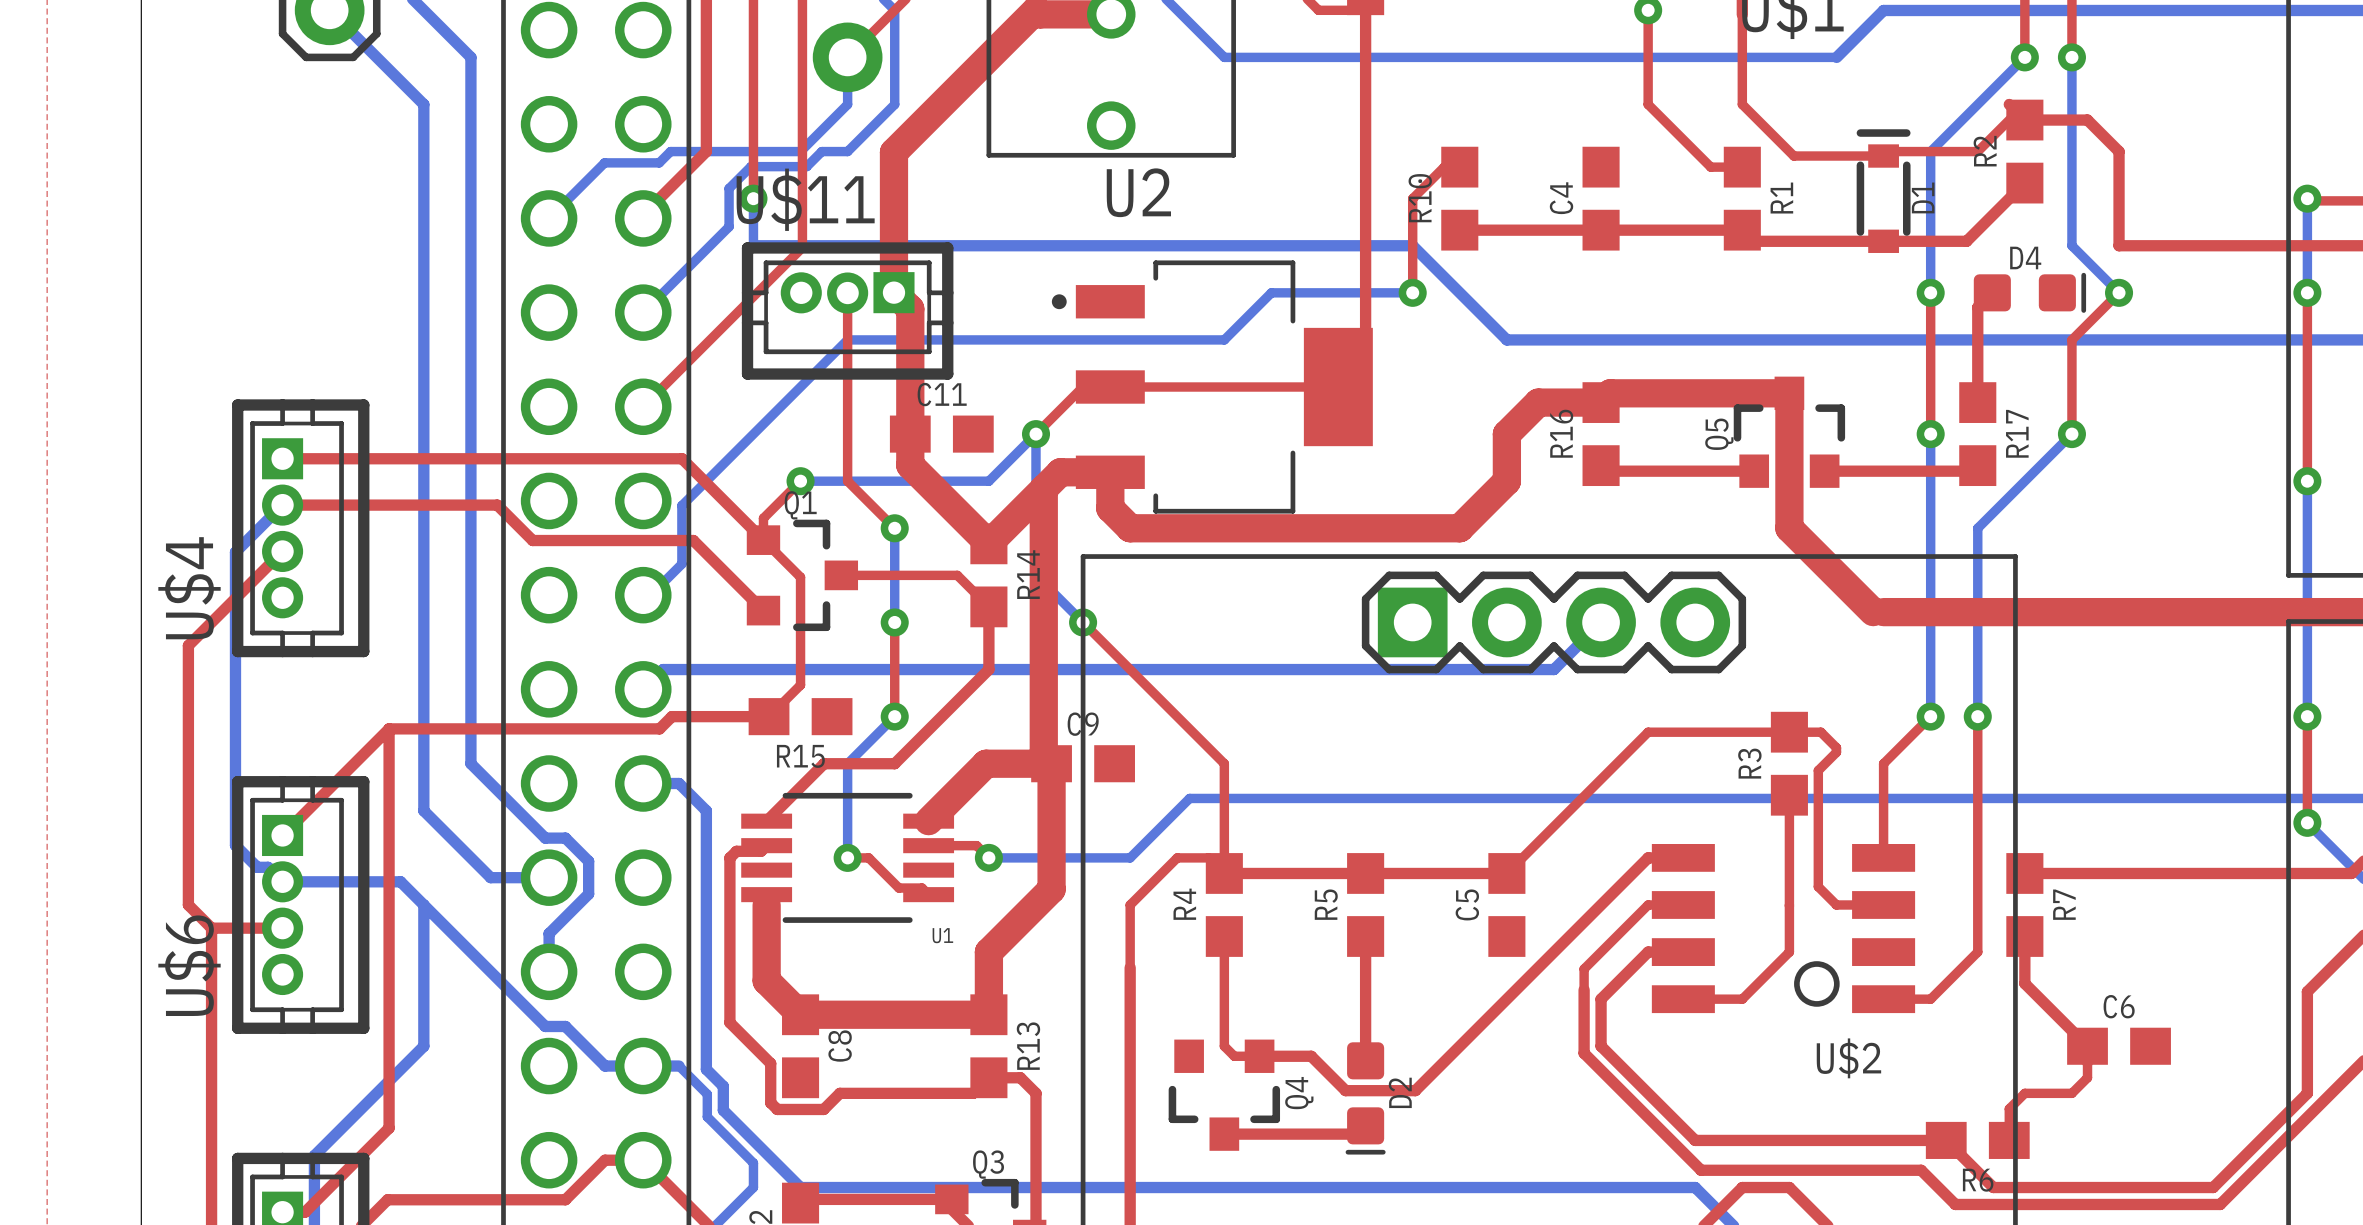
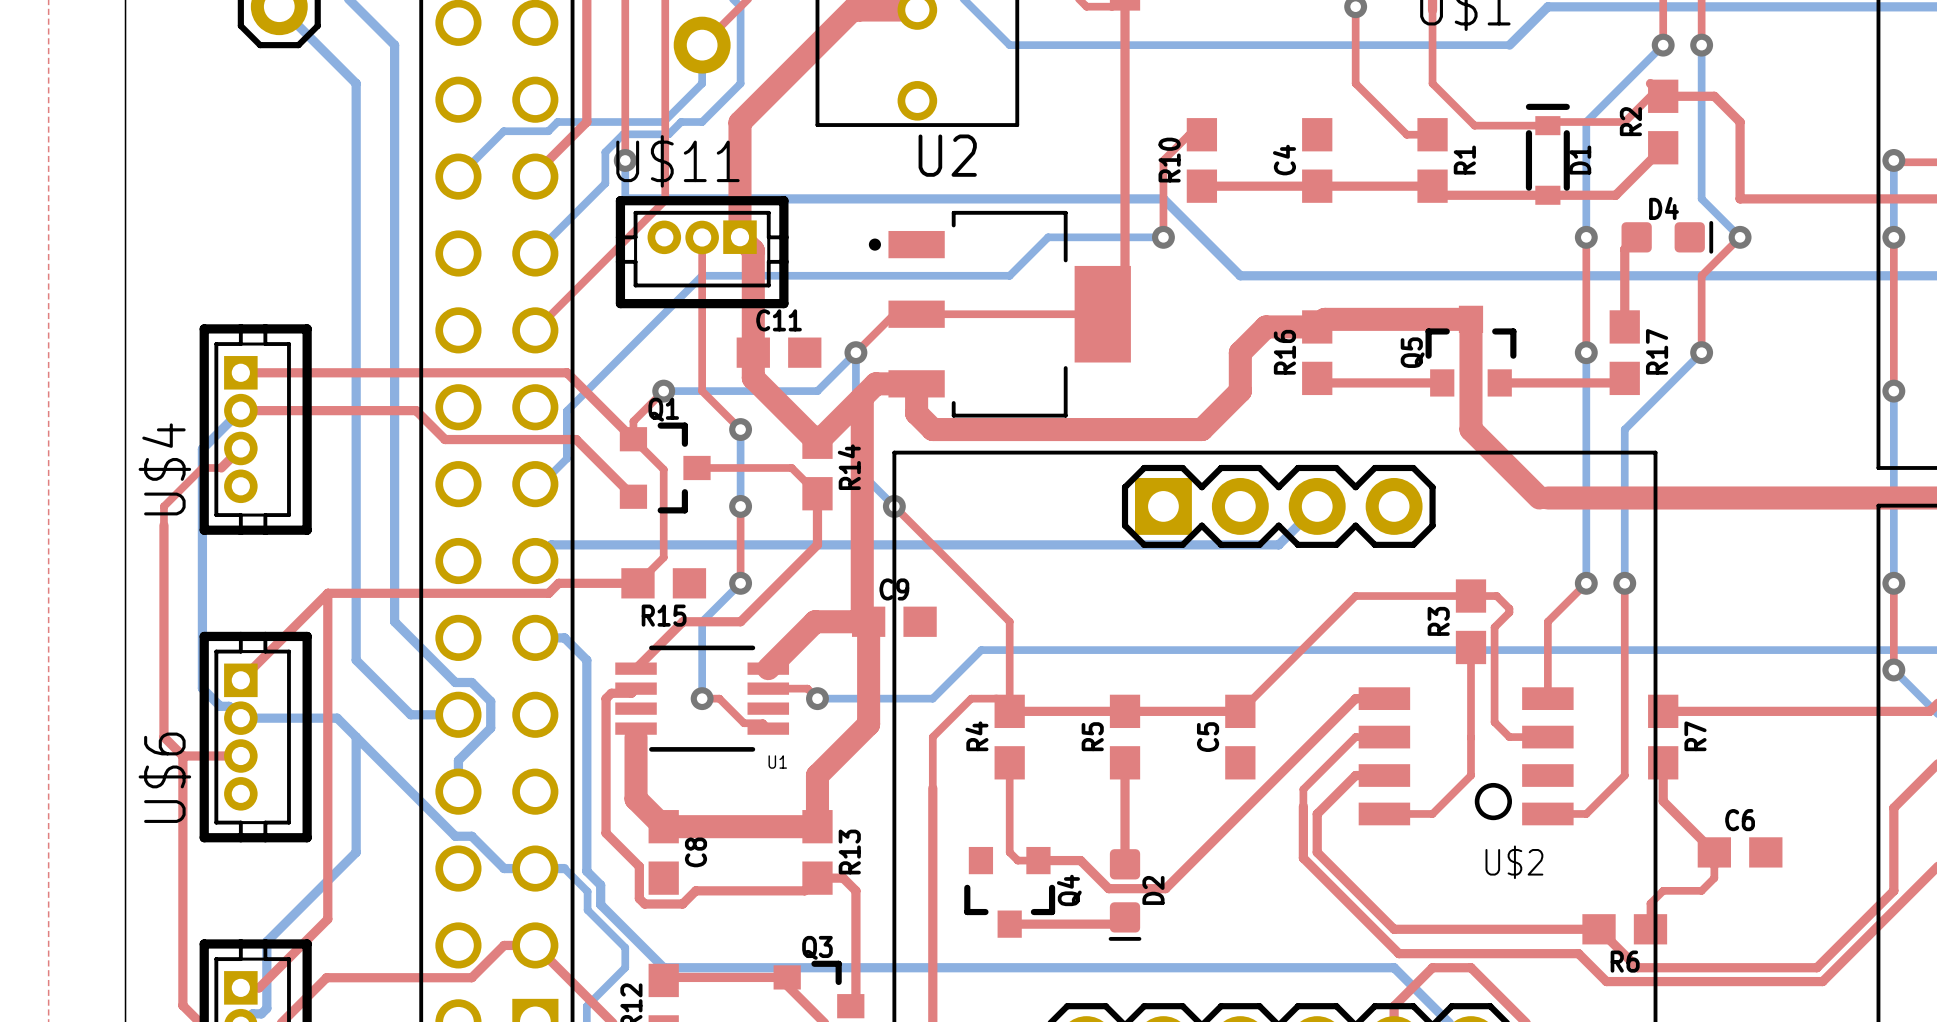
top track: (258, 575) (188, 645) -> (221, 467) (202, 467) (163, 506) (163, 525)

